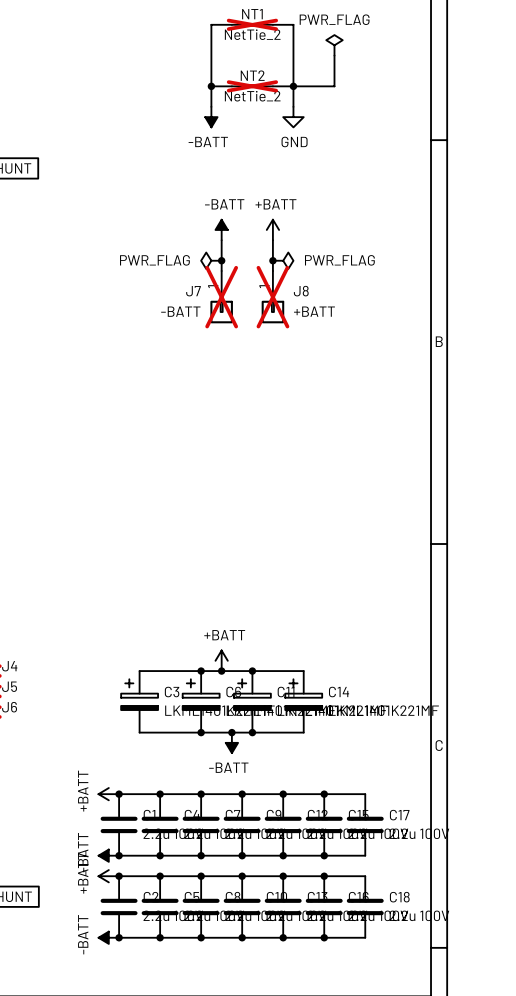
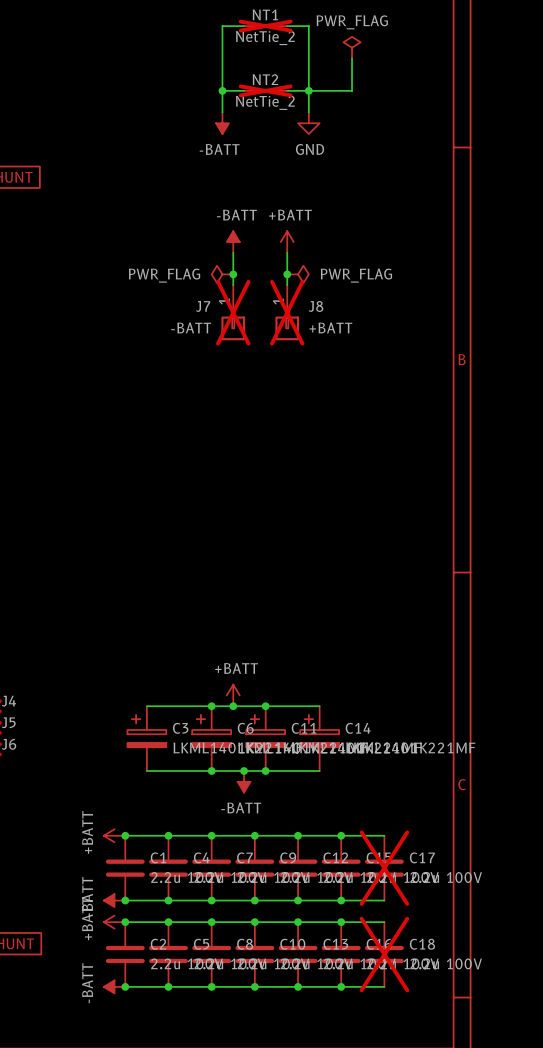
C17 do-not-place cross: none -> (384, 868)
C18 do-not-place cross: none -> (384, 954)

